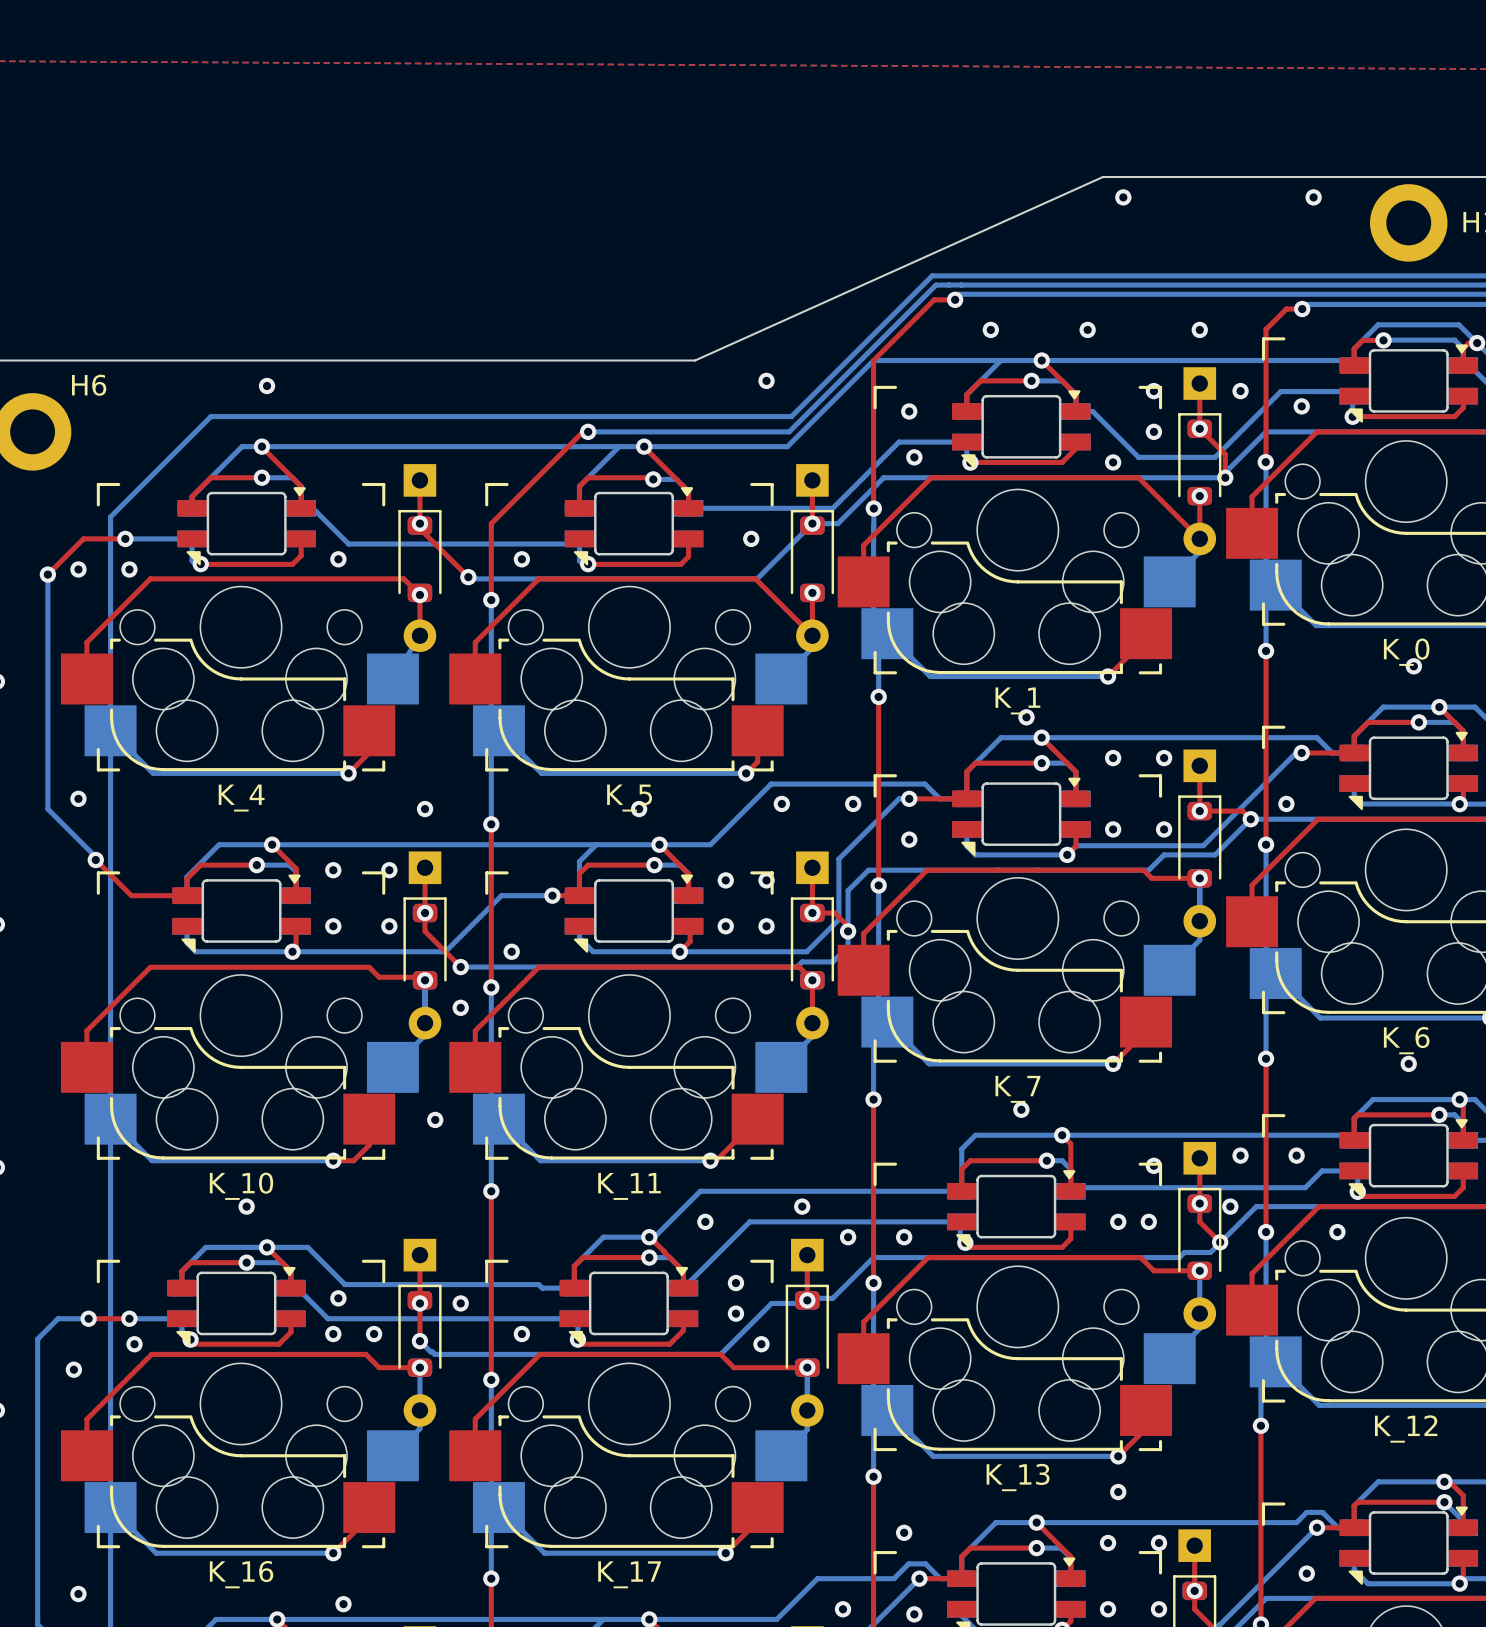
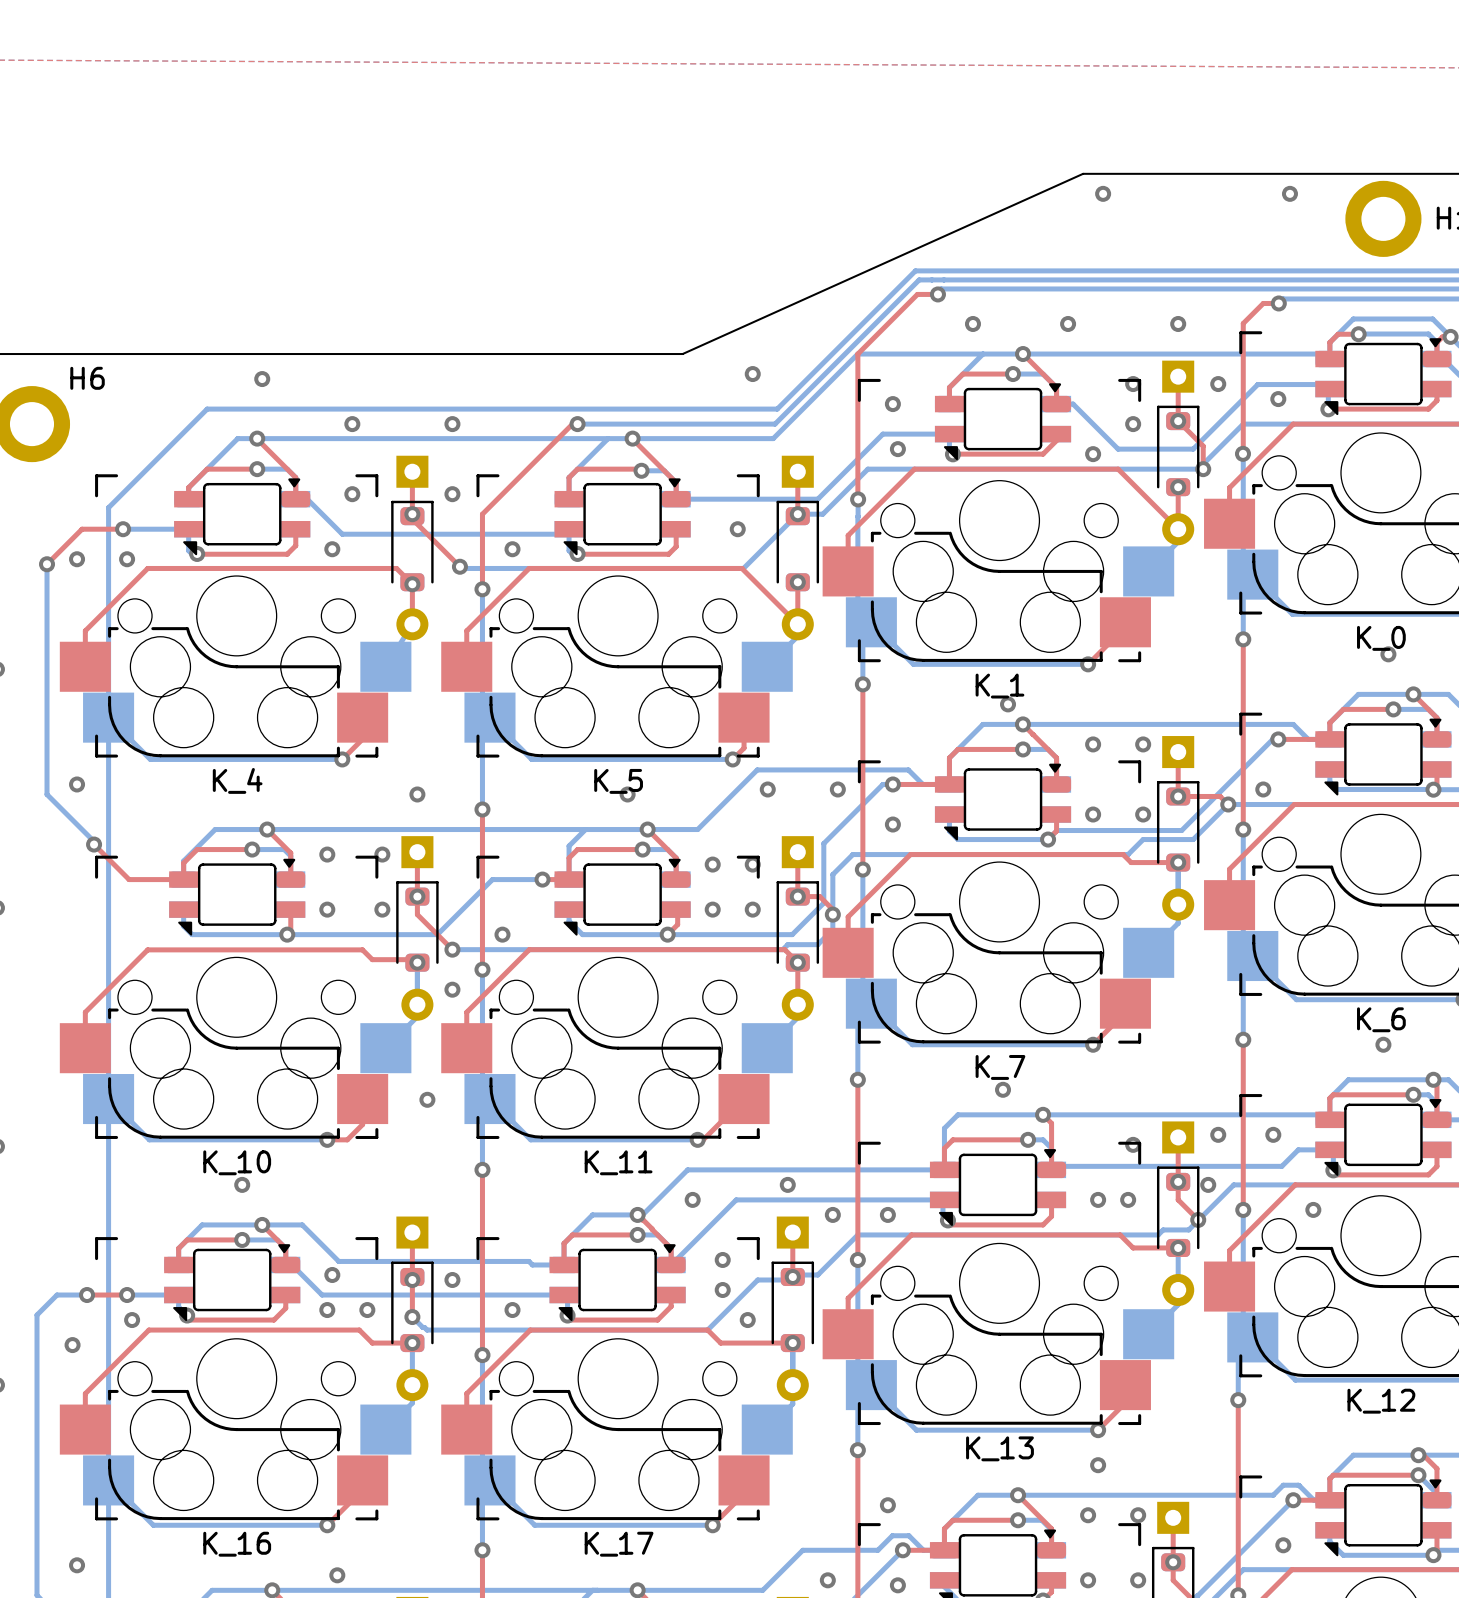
via: none -> (352, 424)
via: none -> (452, 424)
via: none -> (352, 494)
via: none -> (452, 494)

